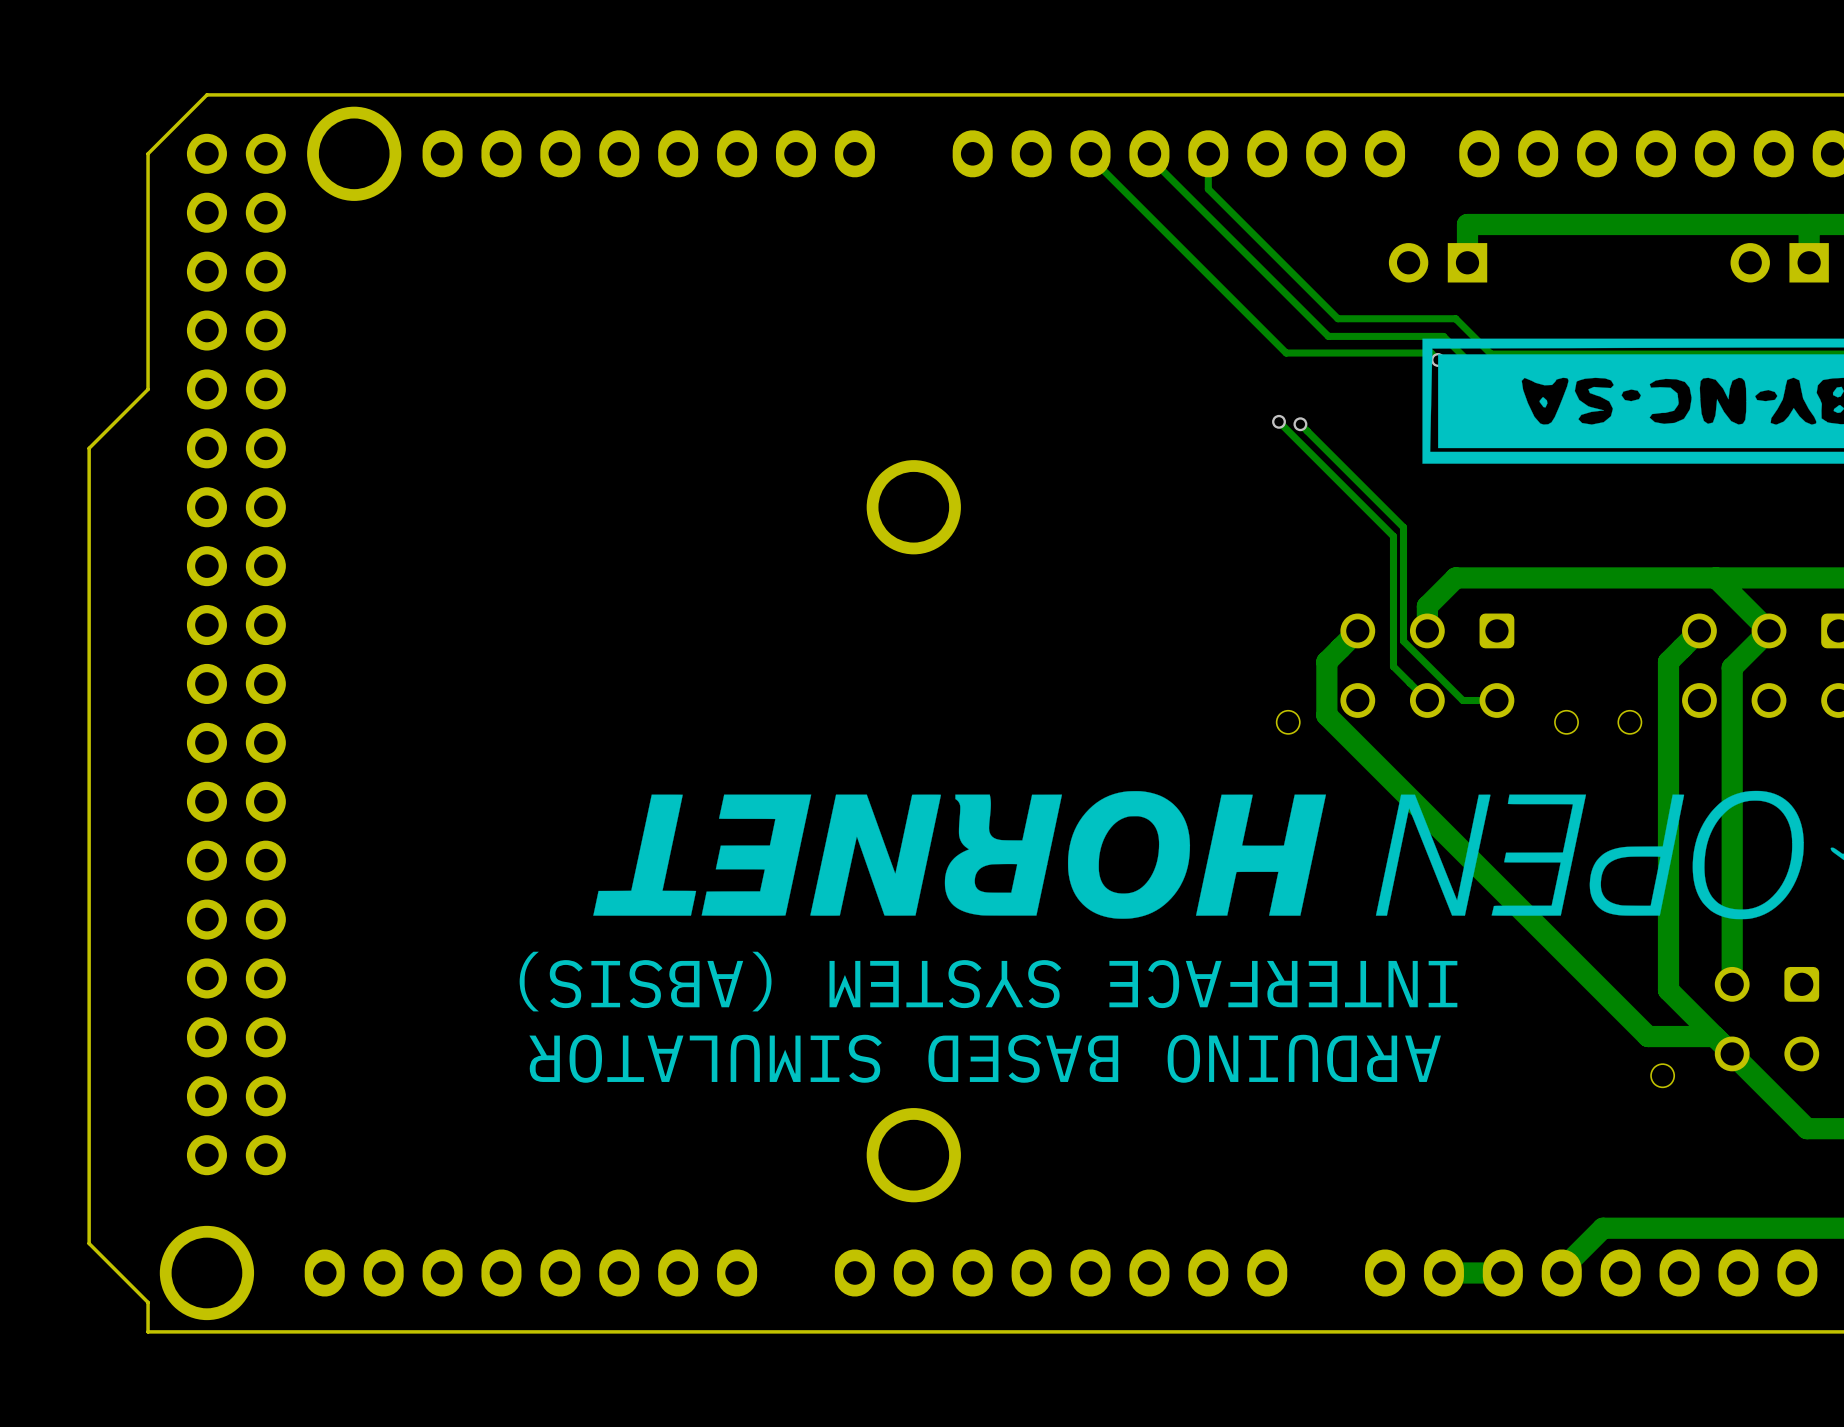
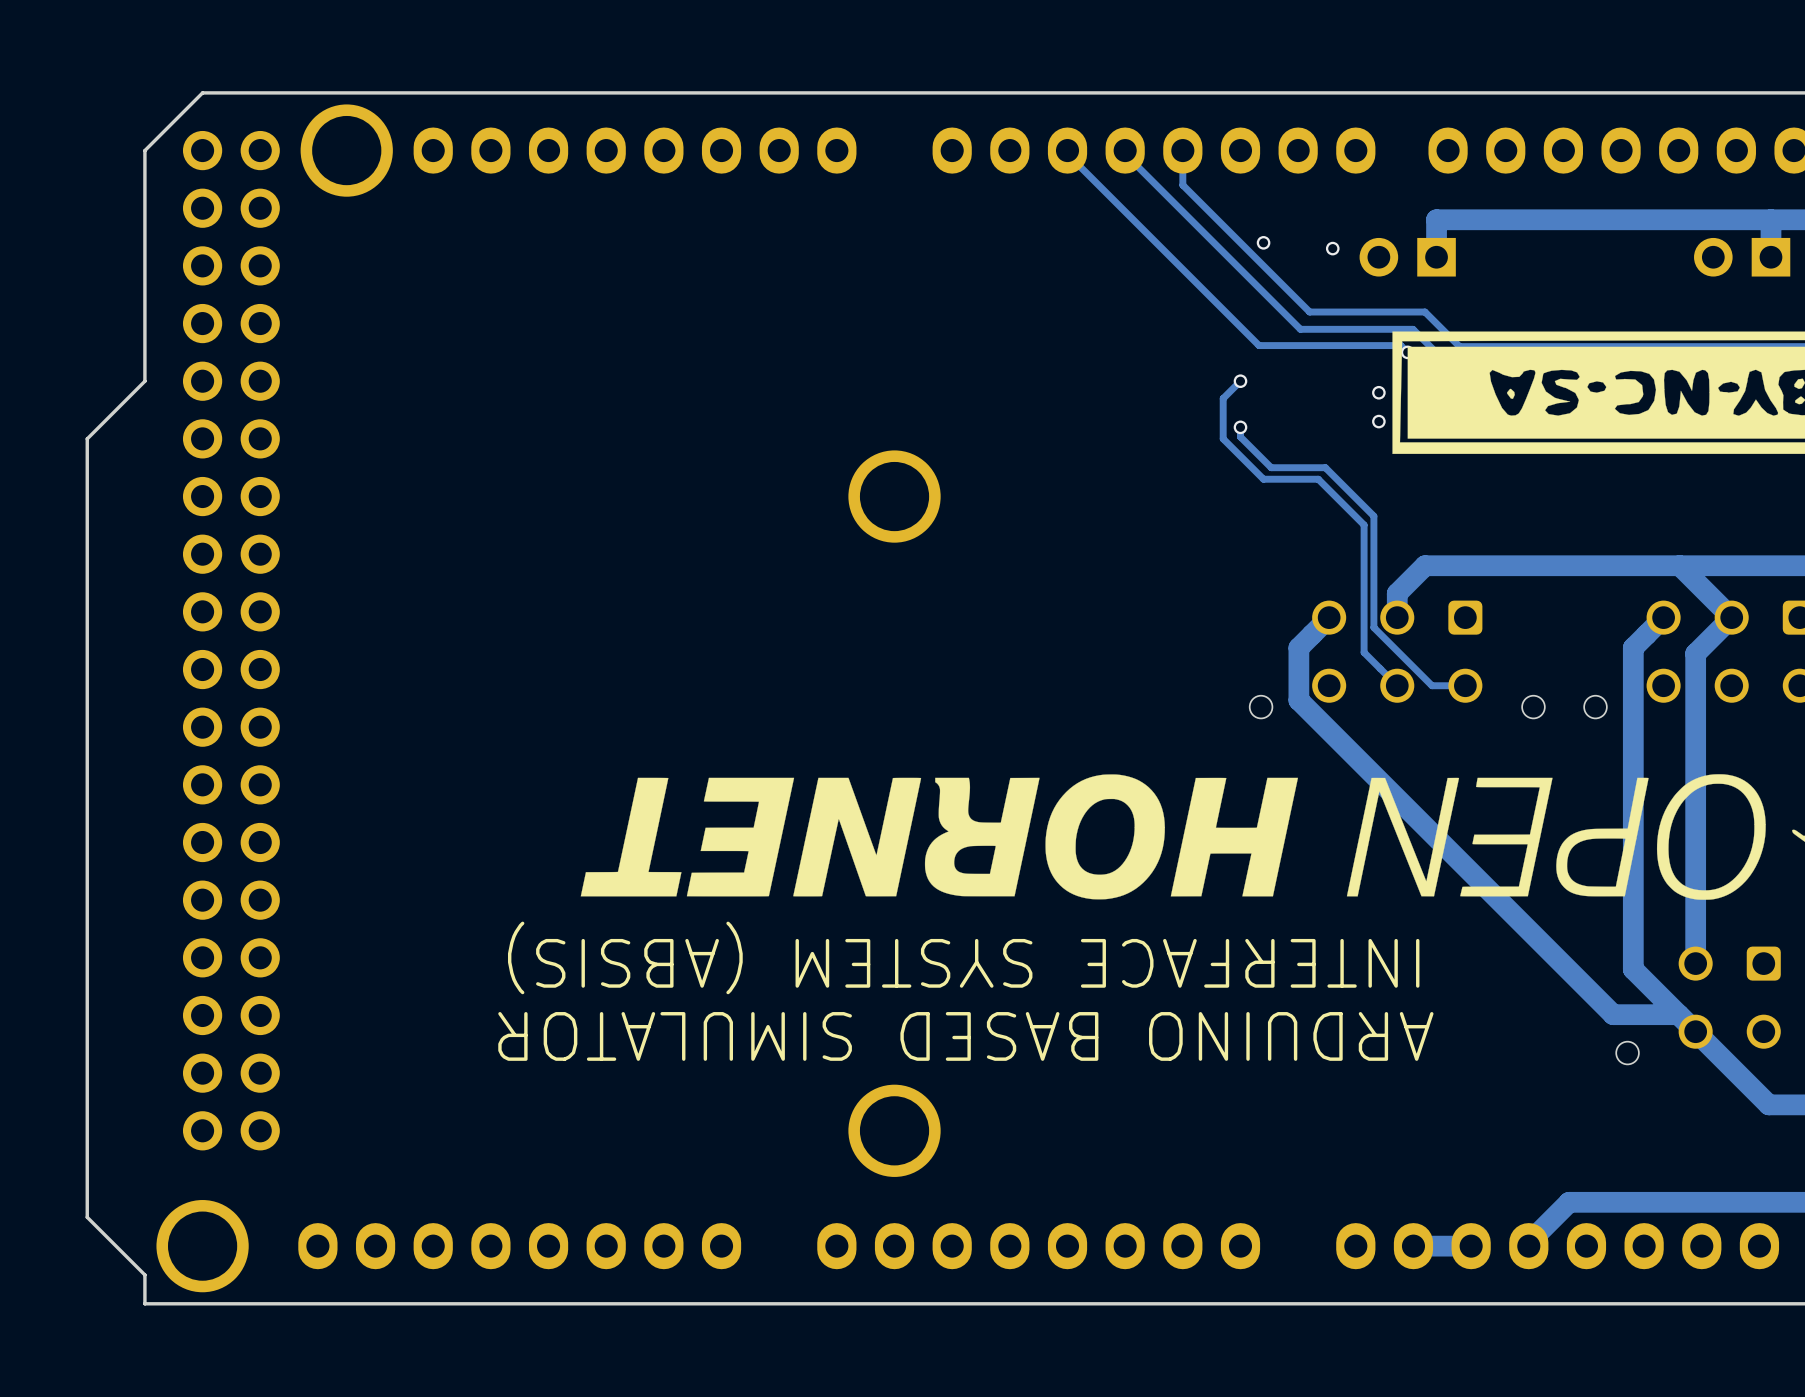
via: none -> (1263, 242)
via: none -> (1332, 248)
via: none -> (1240, 381)
via: none -> (1378, 392)
track: (1279, 421) (1346, 489) -> (1240, 381) (1223, 398) (1223, 438) (1263, 479) (1318, 479)
via: (1279, 421) -> none
track: (1300, 424) (1353, 477) -> (1240, 427) (1240, 436) (1271, 467) (1325, 467)
via: (1300, 424) -> none
via: none -> (1378, 421)
via: none -> (1240, 427)

